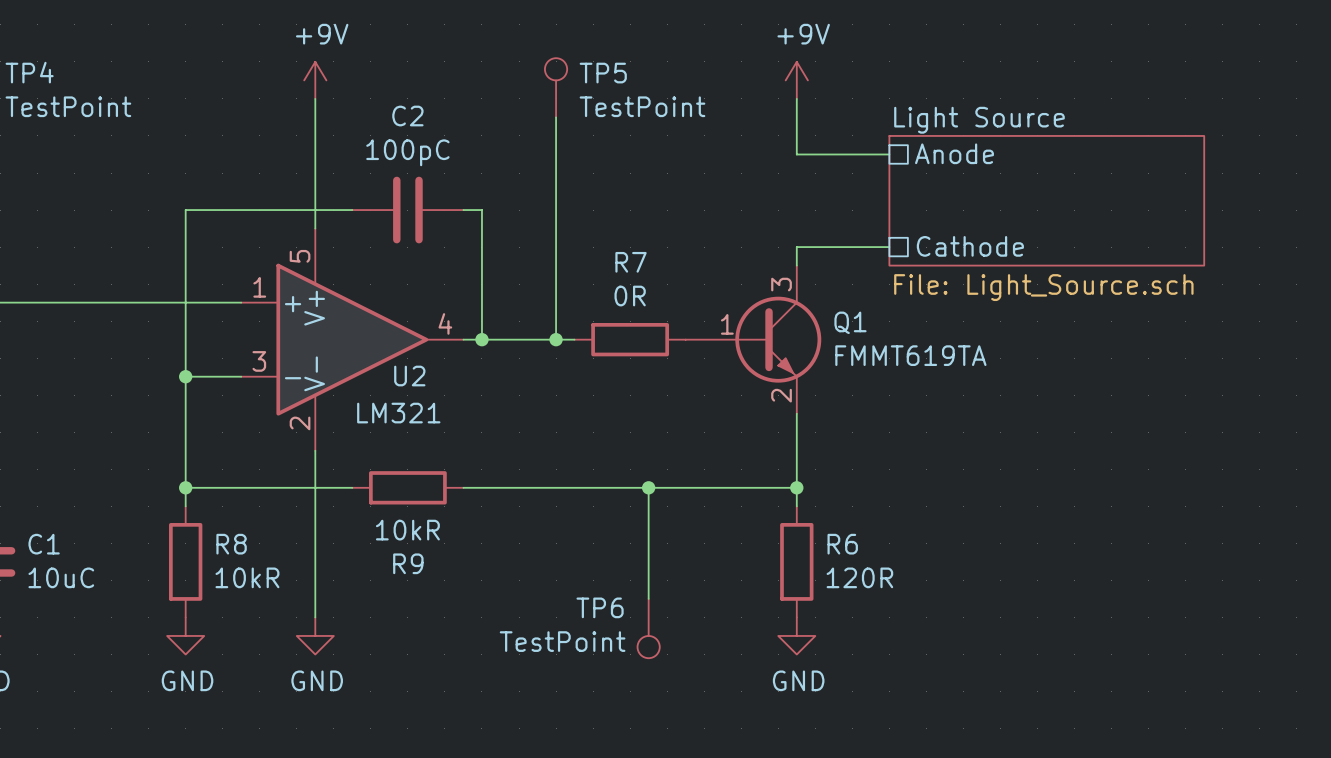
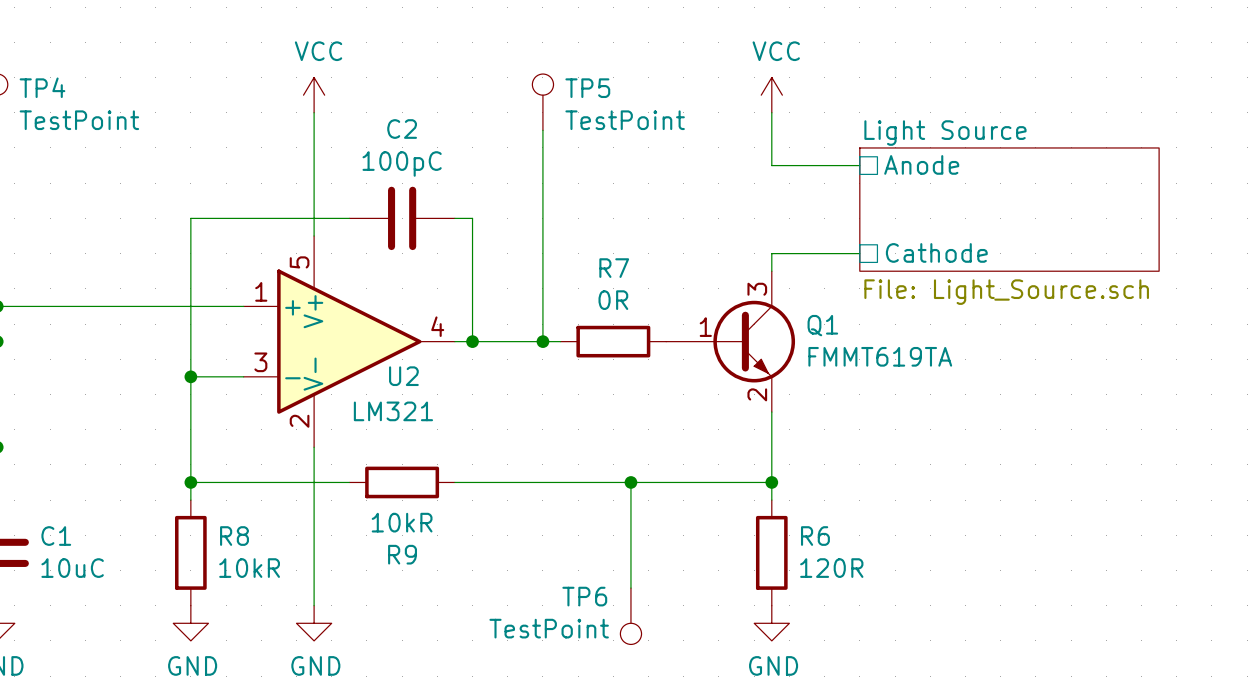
power symbol: +9V (315, 80) -> VCC (314, 95)
power symbol: +9V (796, 80) -> VCC (771, 95)

